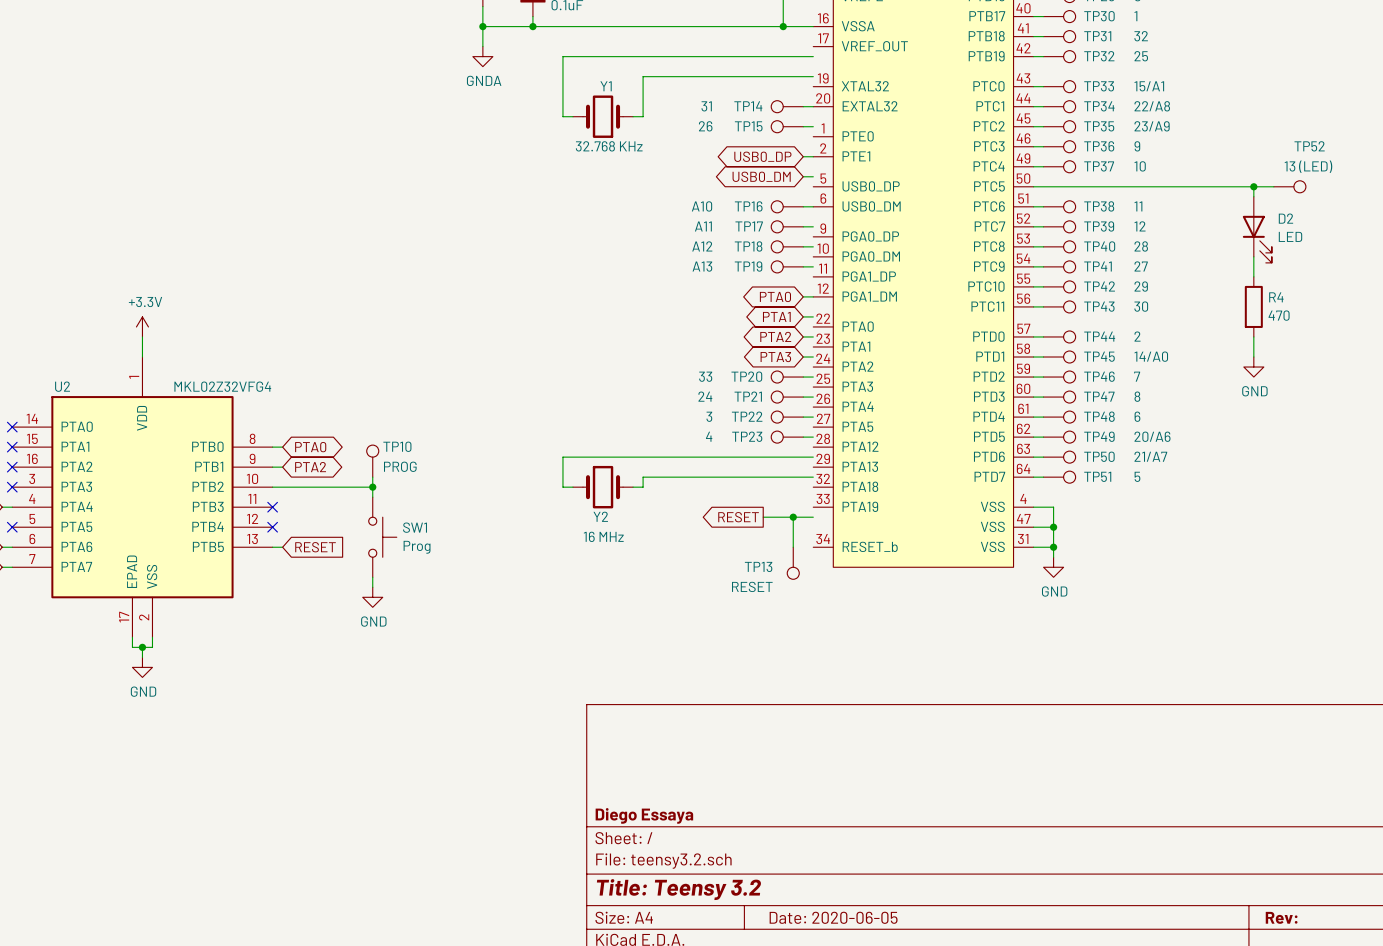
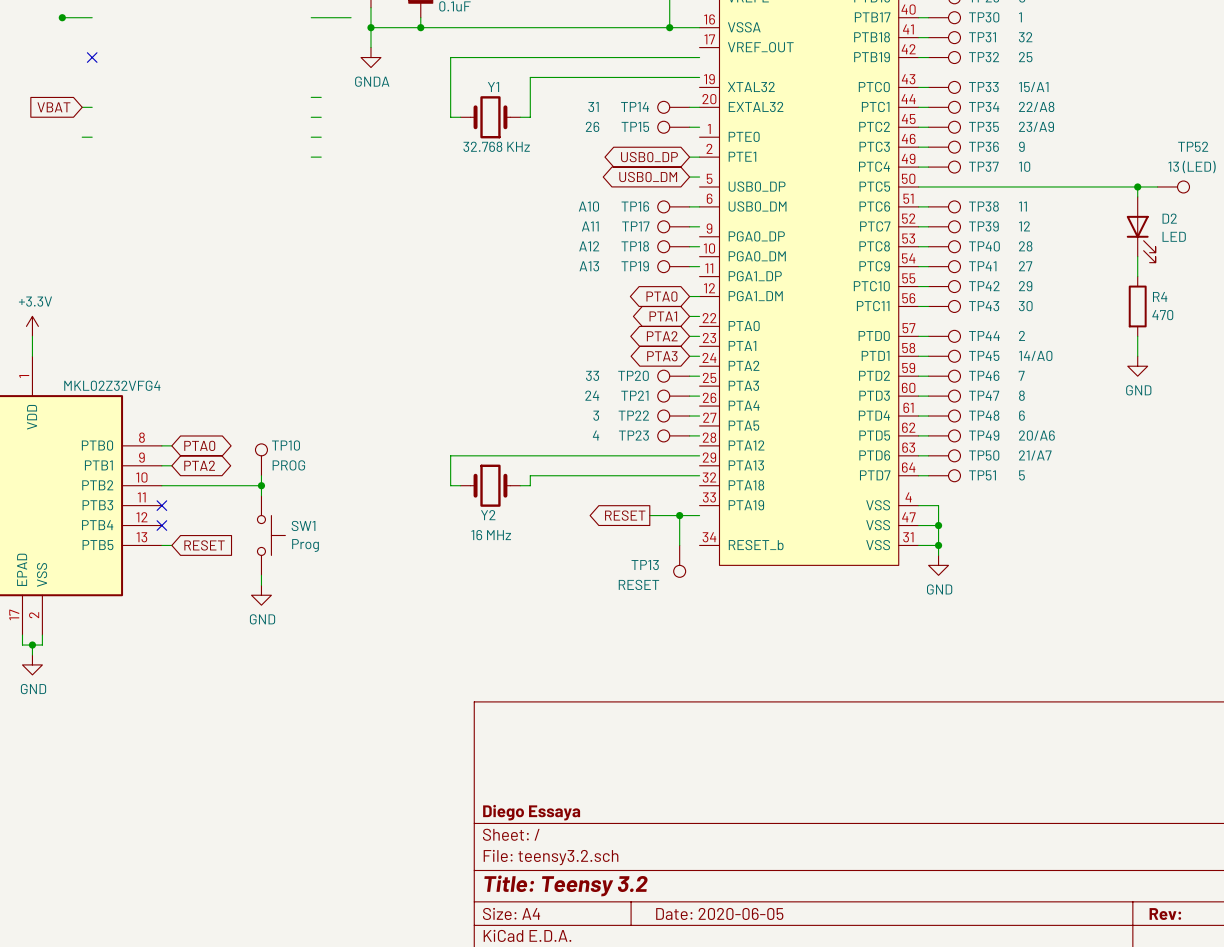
wire: none -> (62, 17) (92, 17)
junction: none -> (62, 17)
wire: none -> (311, 17) (351, 17)
no-connect mark: none -> (92, 57)
wire: none -> (311, 97) (321, 97)
global label: none -> VBAT (53, 107)
wire: none -> (82, 107) (92, 107)
wire: none -> (311, 117) (321, 117)
wire: none -> (82, 137) (92, 137)
wire: none -> (311, 137) (321, 137)
wire: none -> (311, 157) (321, 157)

